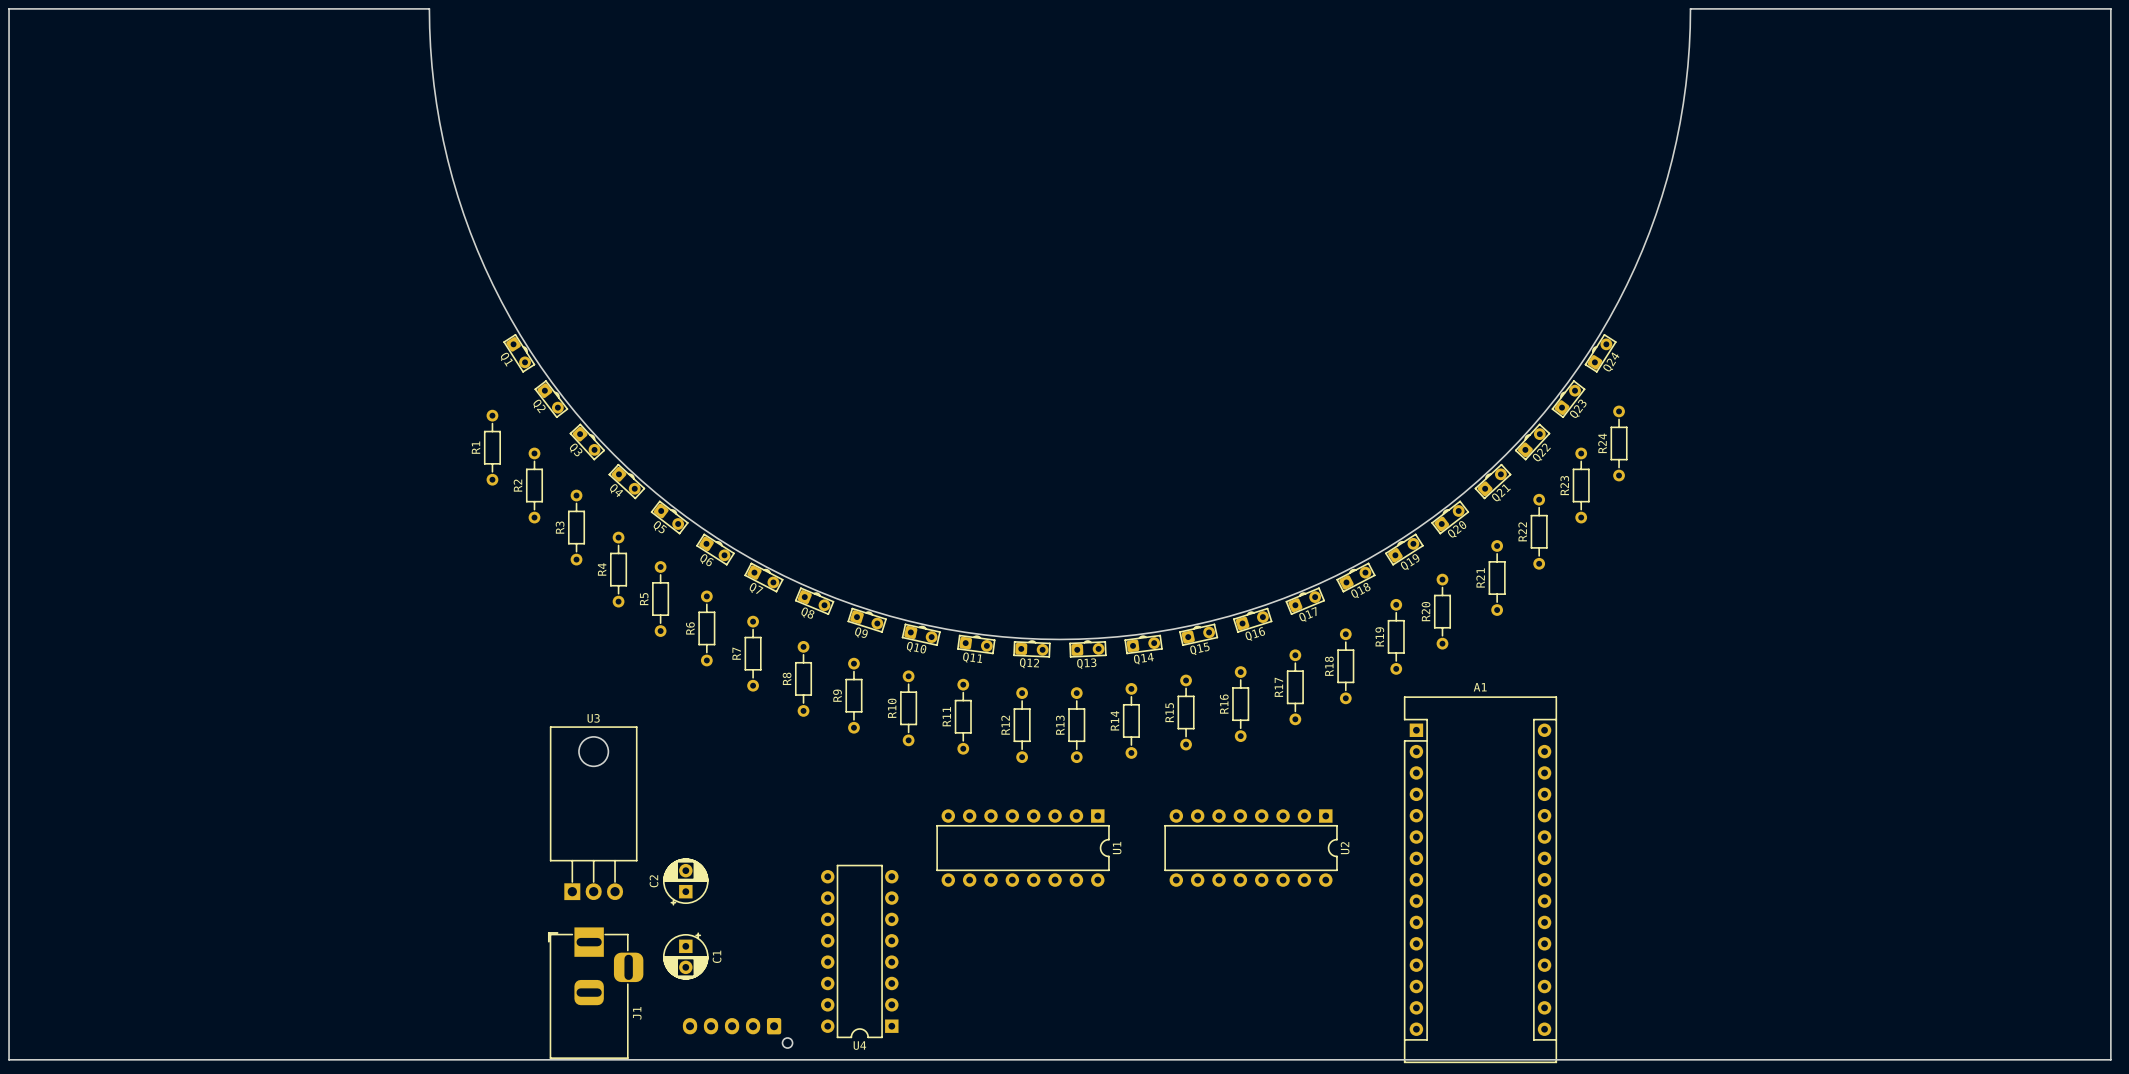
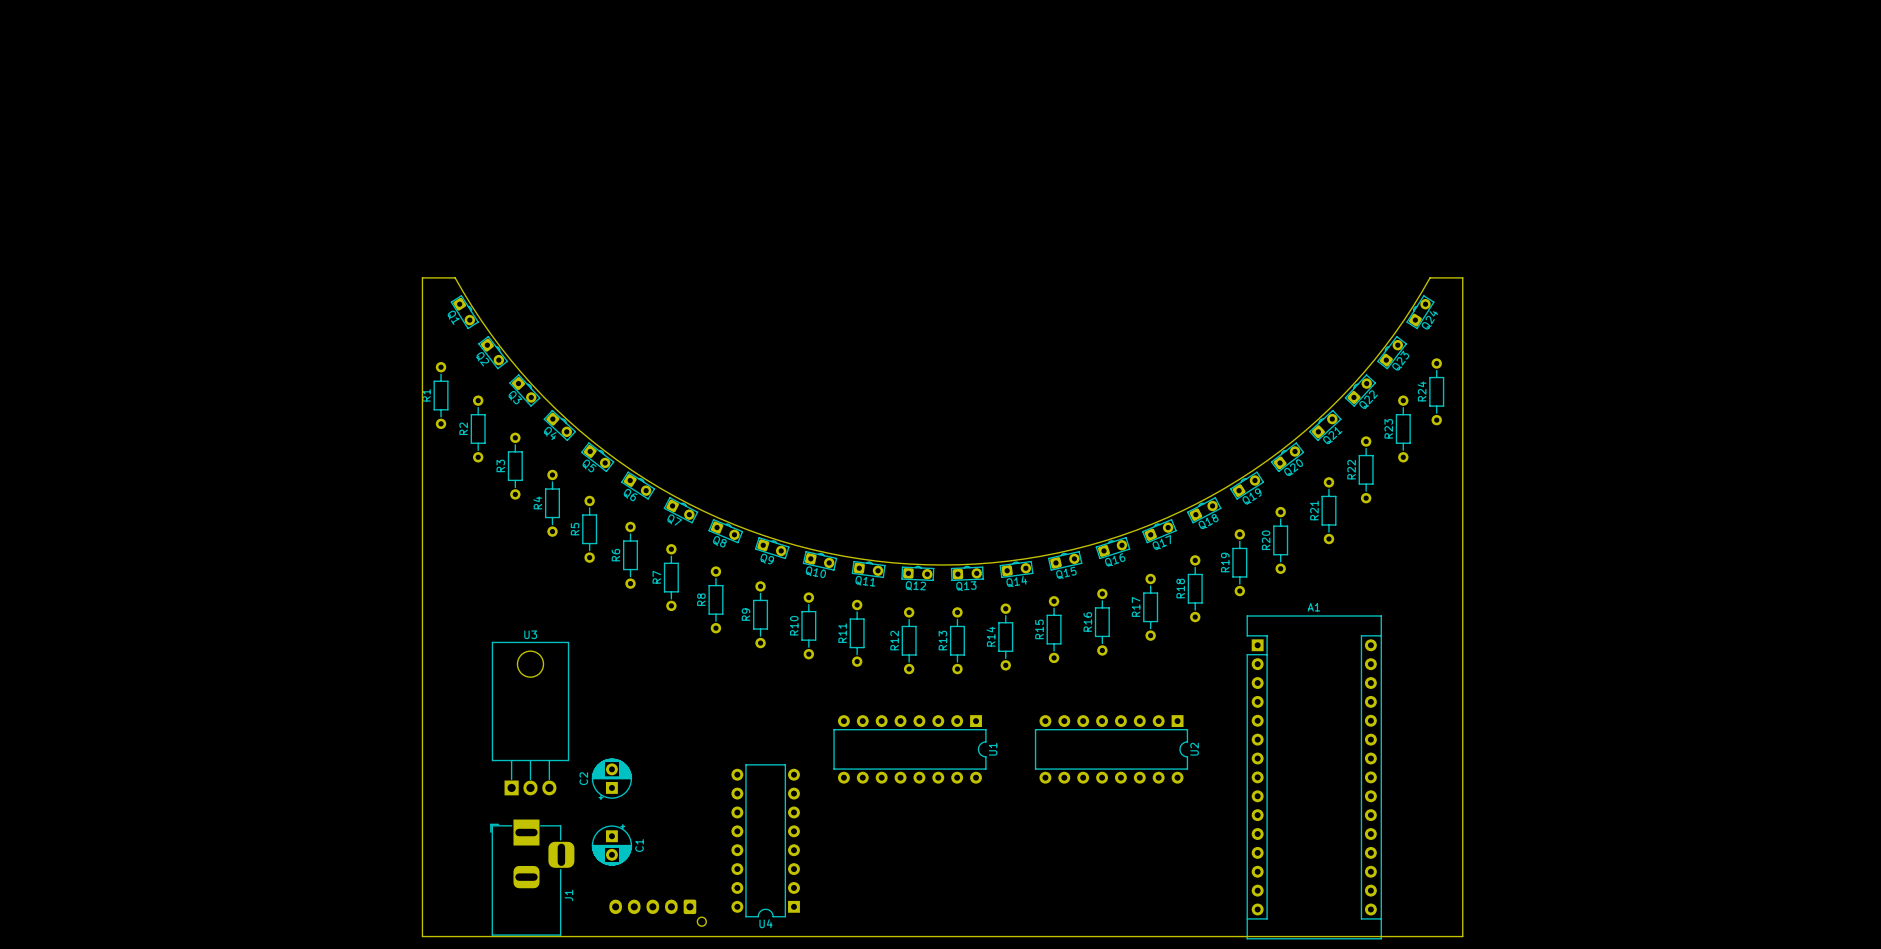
board edge: (471, 1059) (9, 1059) (9, 8) (429, 8) (431, 65) (439, 122) (457, 196) (477, 250) (501, 301) (530, 351) (563, 397) (614, 454) (671, 505) (717, 538) (766, 567) (818, 591) (890, 616) (946, 629) (1002, 636) (1059, 639) (1135, 634) (1192, 625) (1247, 610) (1301, 591) (1352, 567) (1402, 538) (1448, 505) (1505, 454) (1544, 412) (1589, 351) (1618, 301) (1642, 250) (1667, 178) (1680, 122) (1687, 65) (1690, 8) (2110, 8) (2110, 1059) (1648, 1059) -> (422, 936) (422, 277) (455, 277) (500, 346) (543, 396) (605, 451) (674, 496) (733, 524) (796, 545) (860, 558) (942, 565) (1008, 561) (1089, 545) (1151, 524) (1225, 487) (1293, 440) (1341, 396) (1384, 346) (1430, 277) (1462, 277) (1462, 936)

